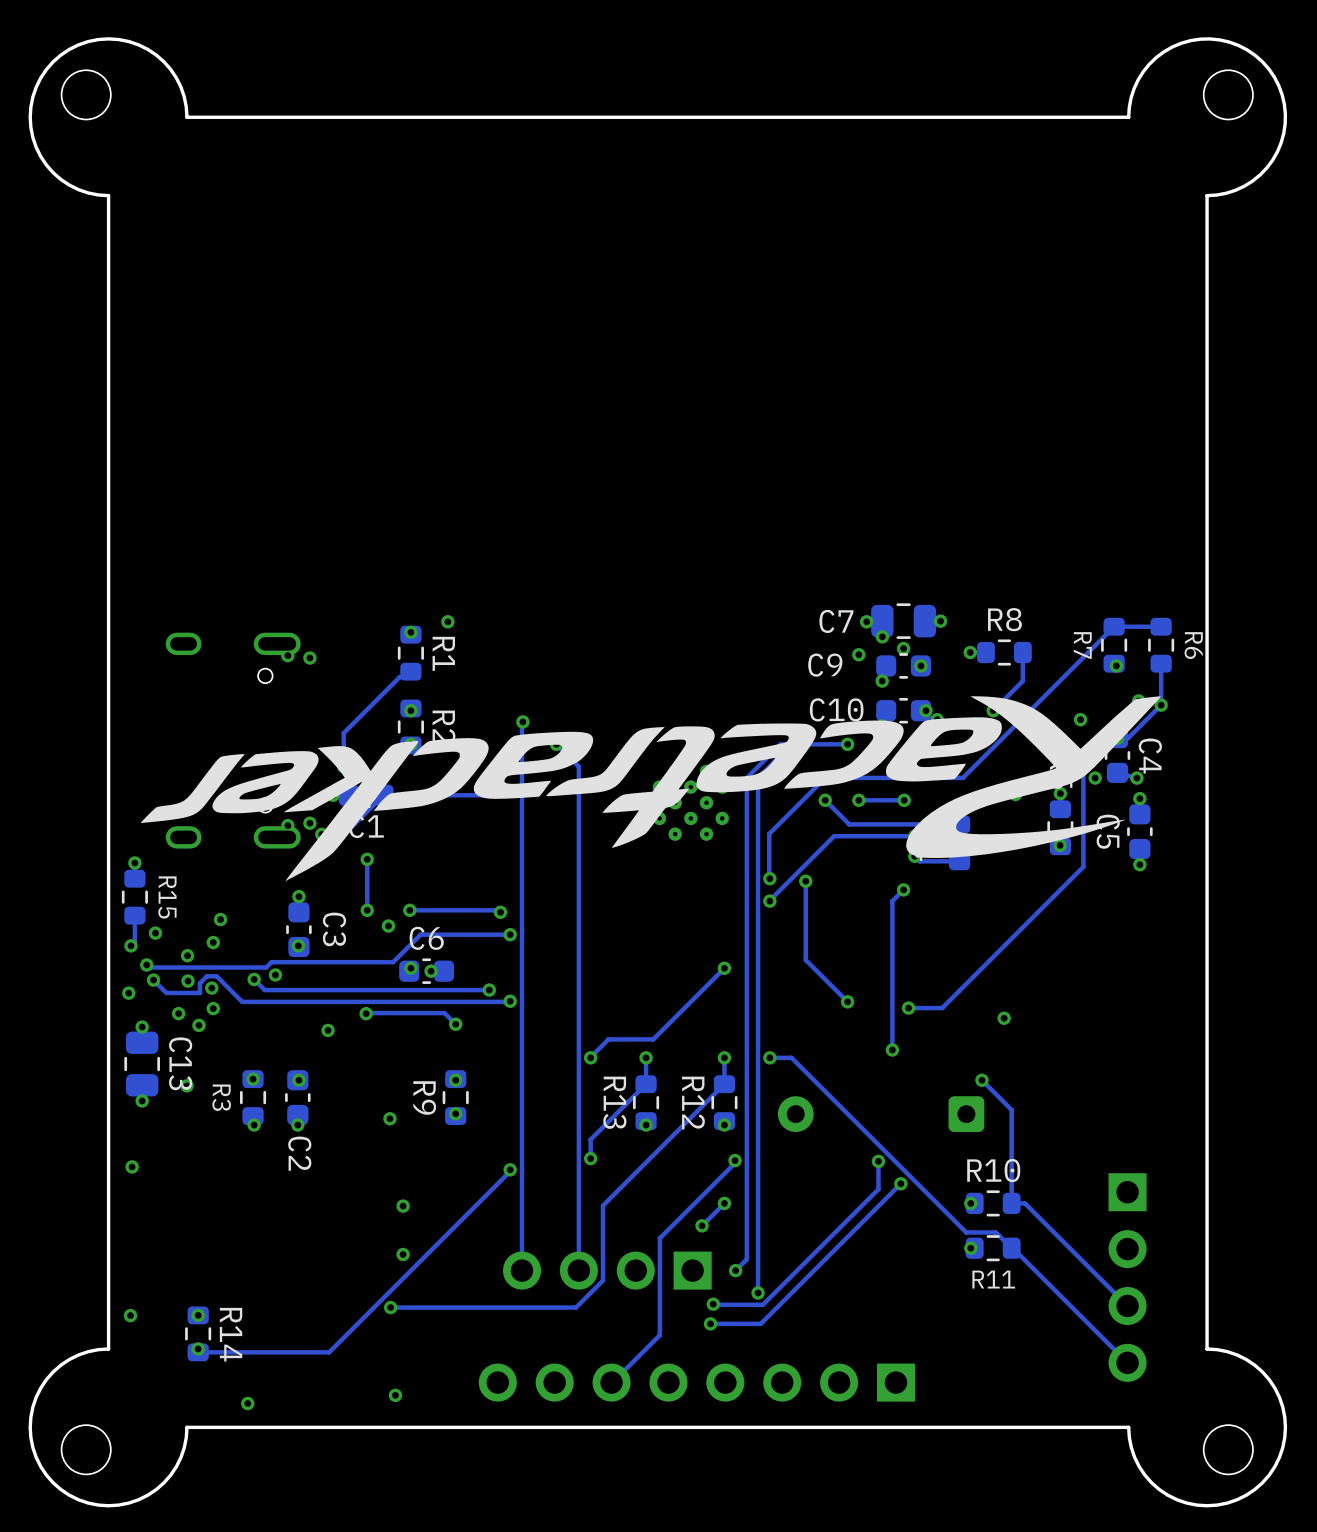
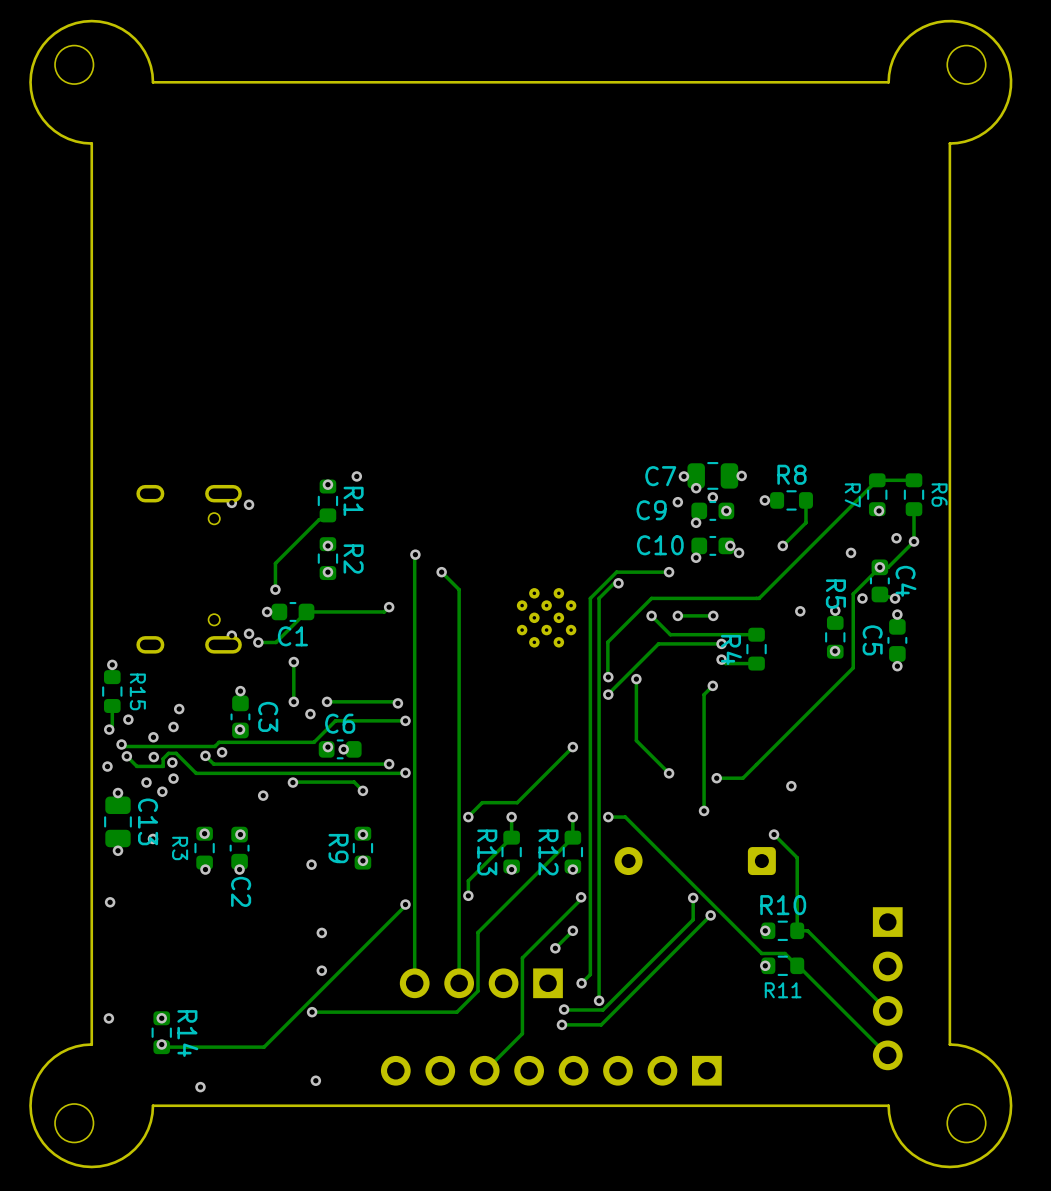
drawing: [140, 696, 1161, 881] -> none

